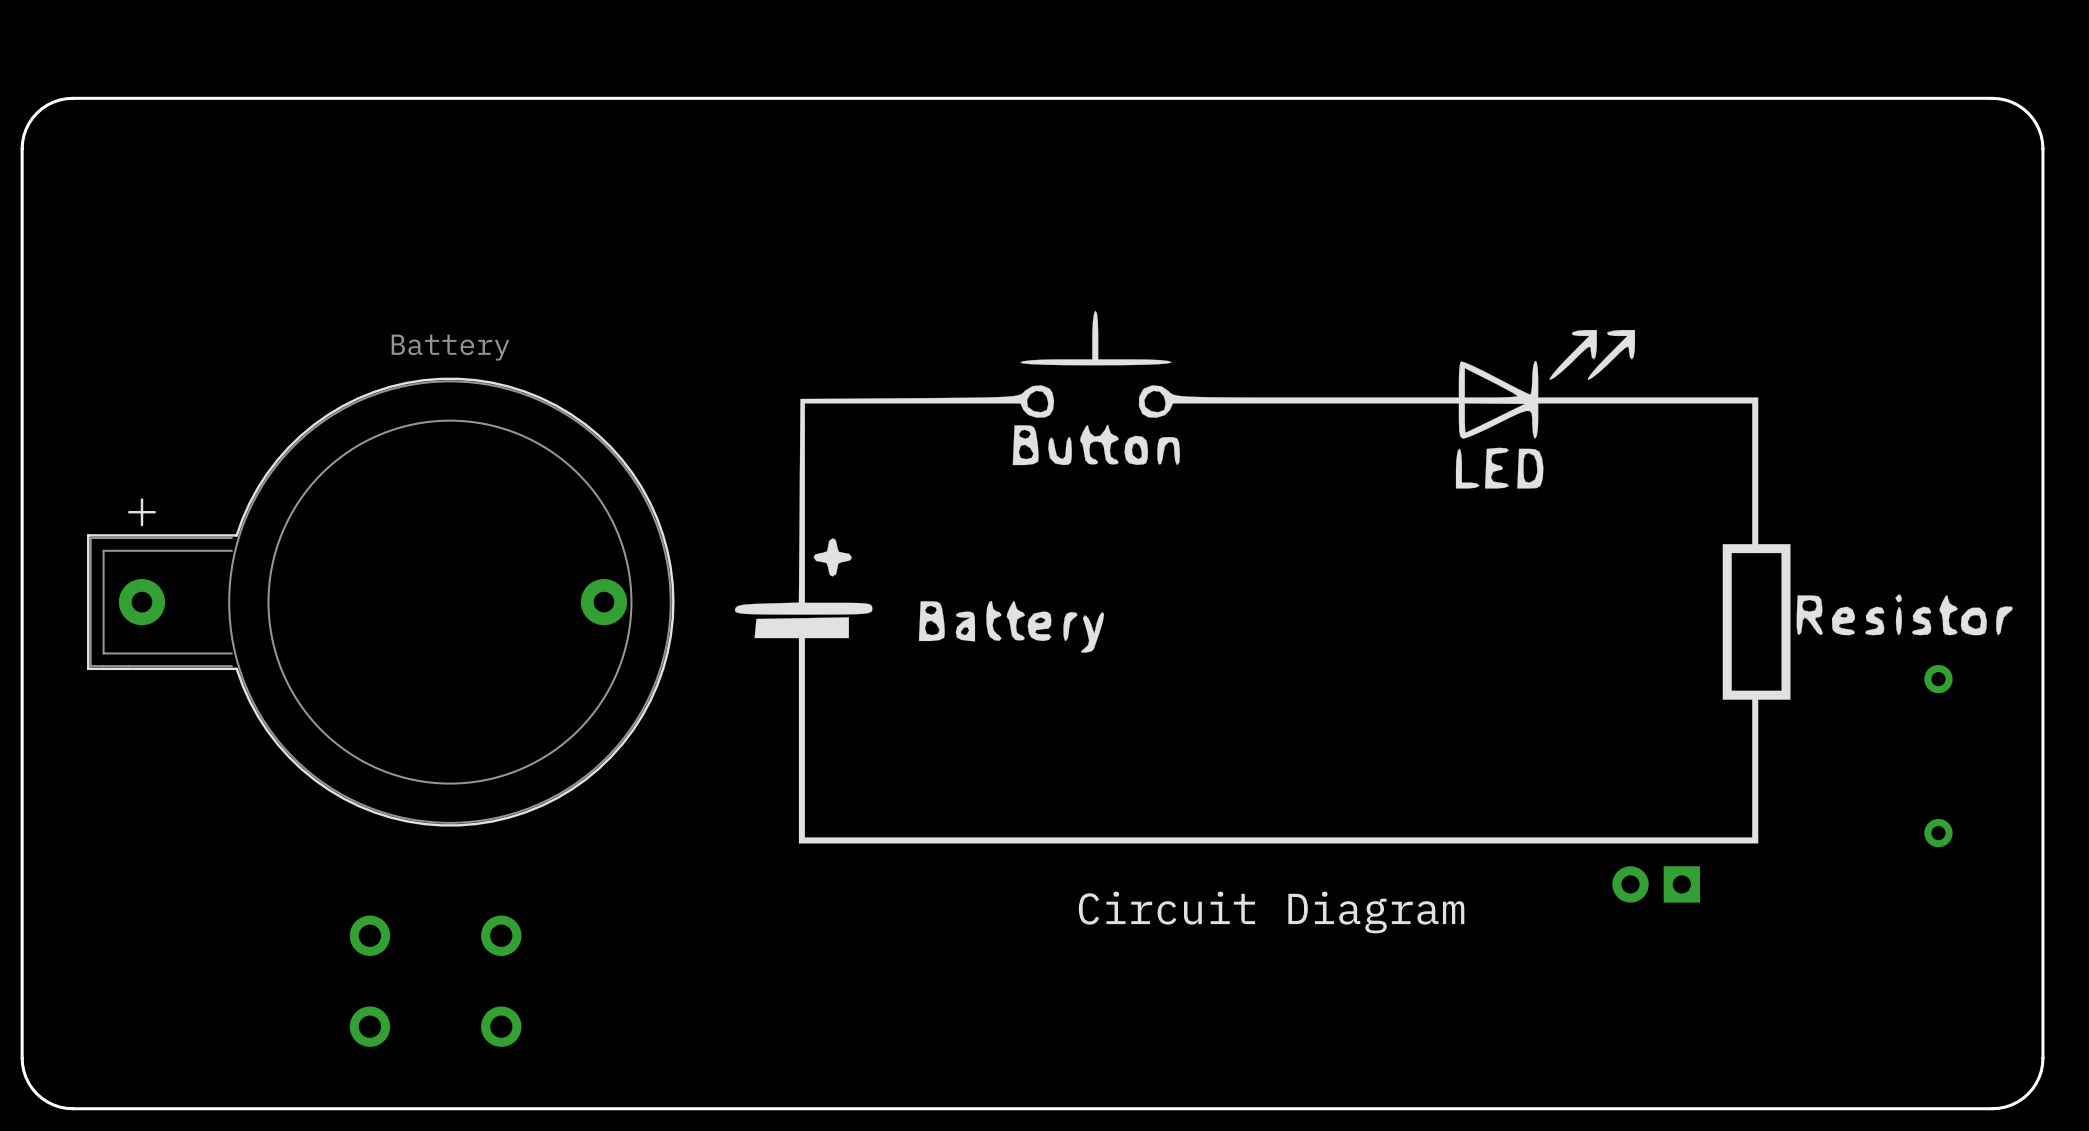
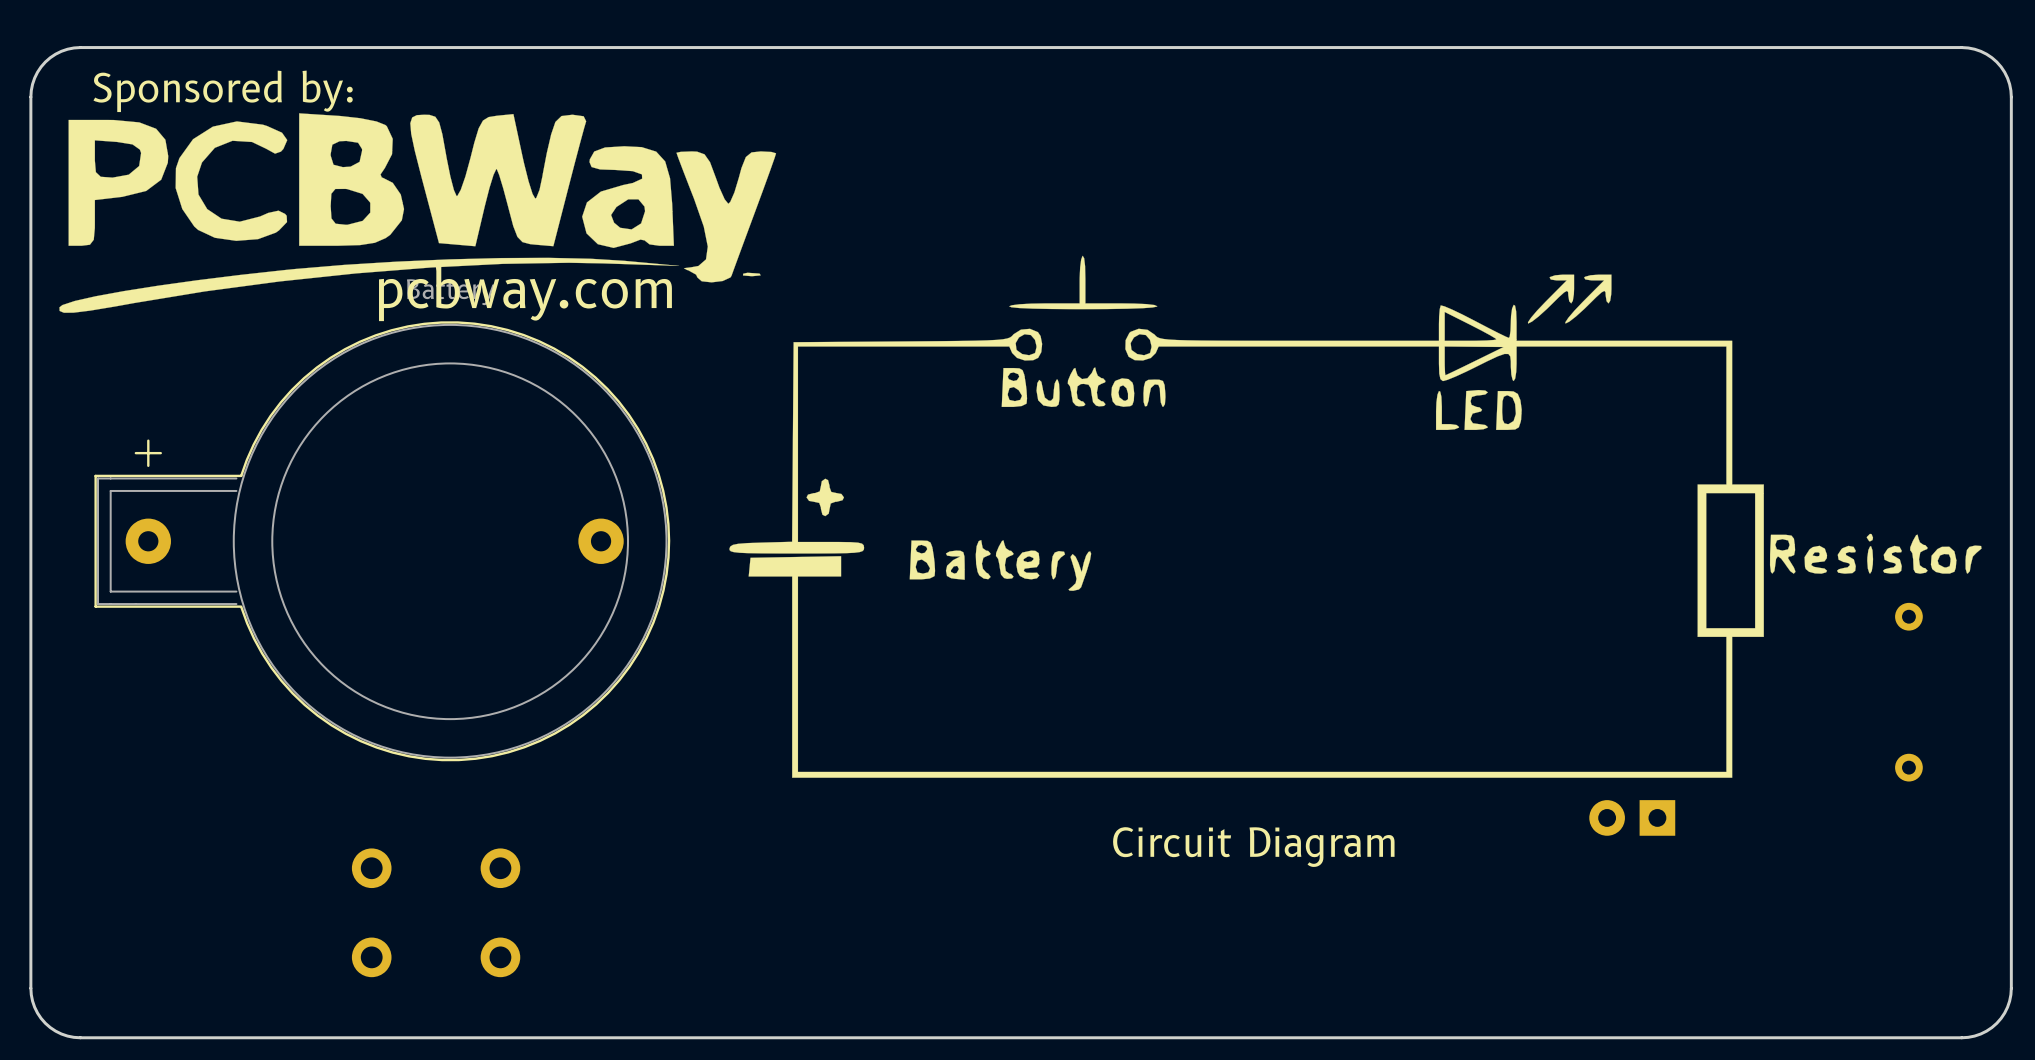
text: none -> Sponsored by: (223, 91)
drawing: none -> [59, 113, 777, 313]
text: none -> pcbway.com (525, 293)

